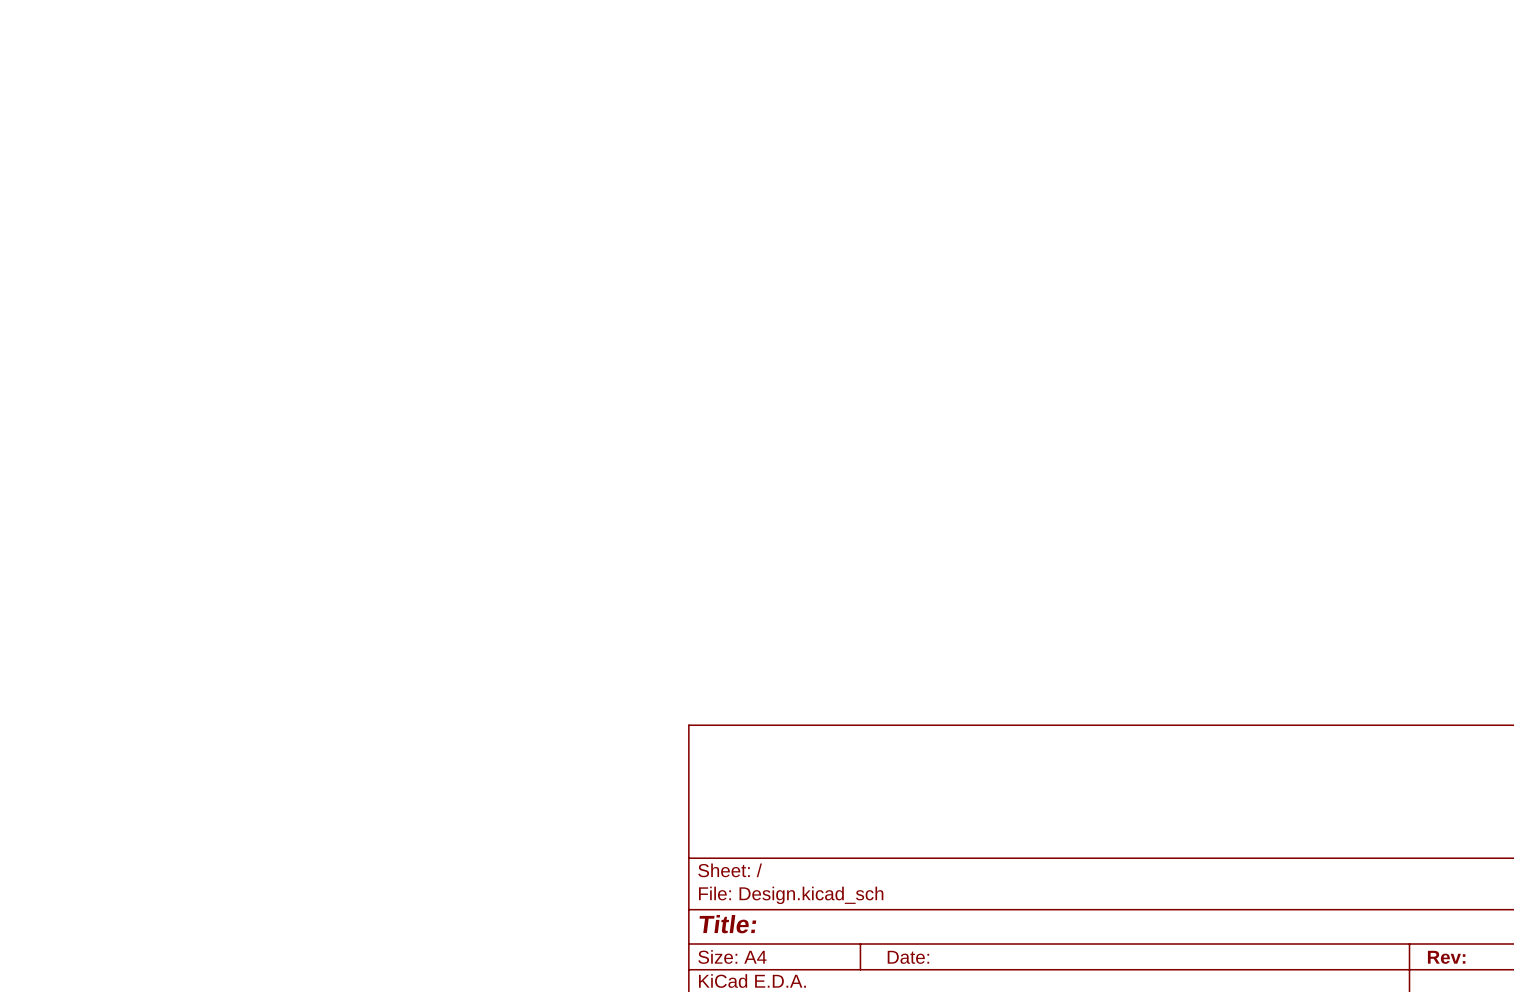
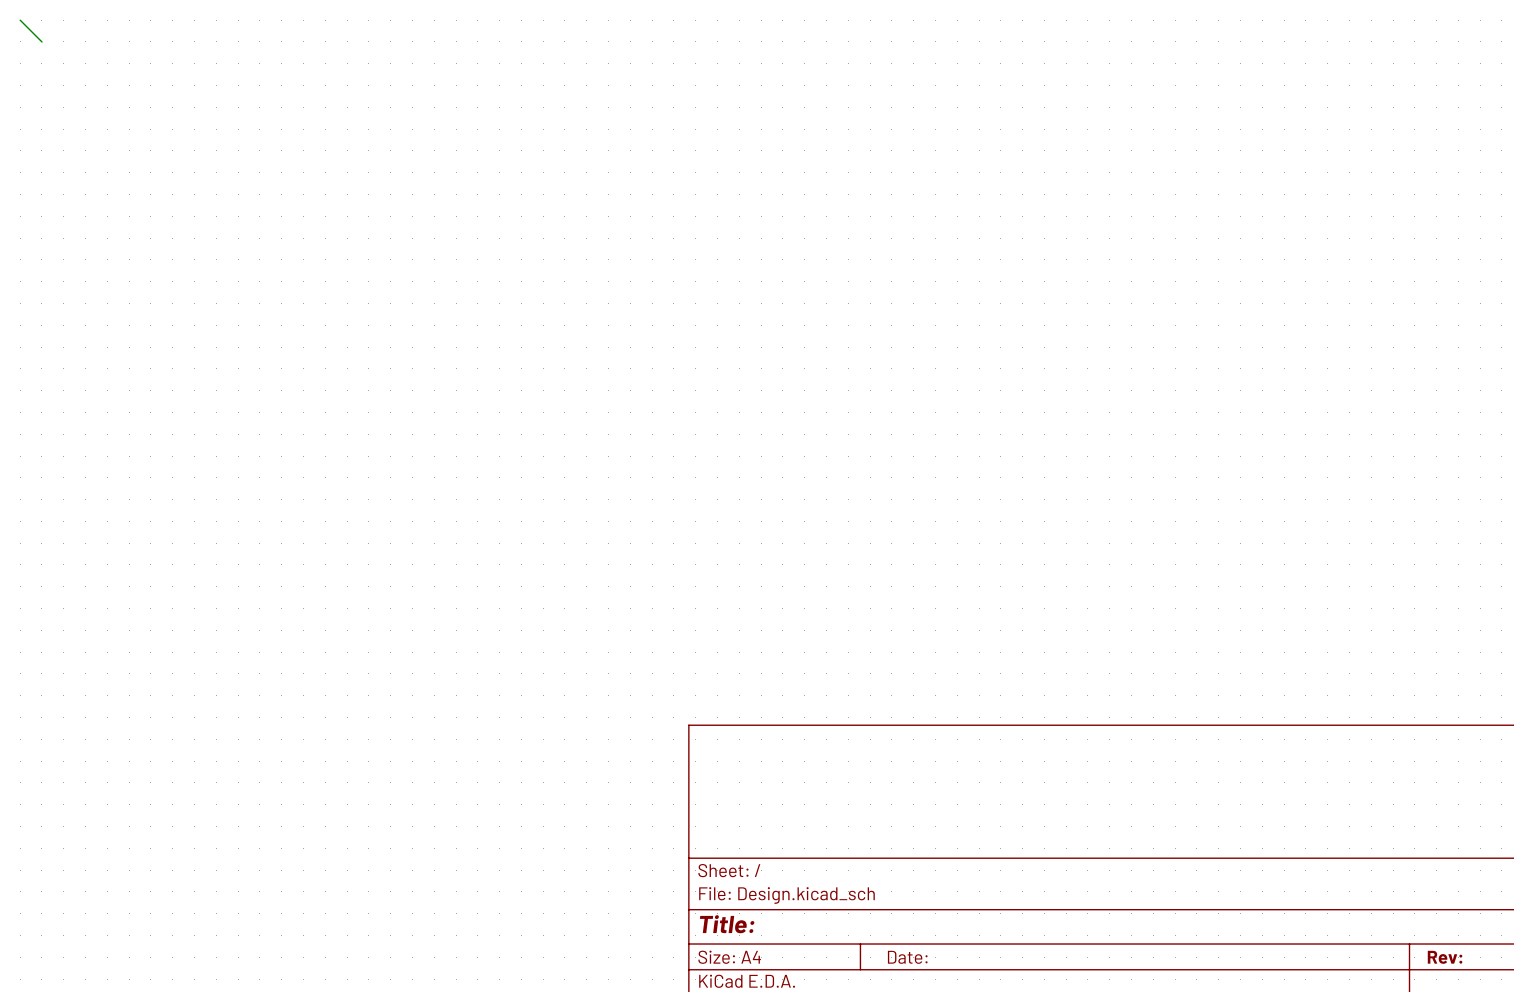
wire: none -> (20, 20) (41, 41)

